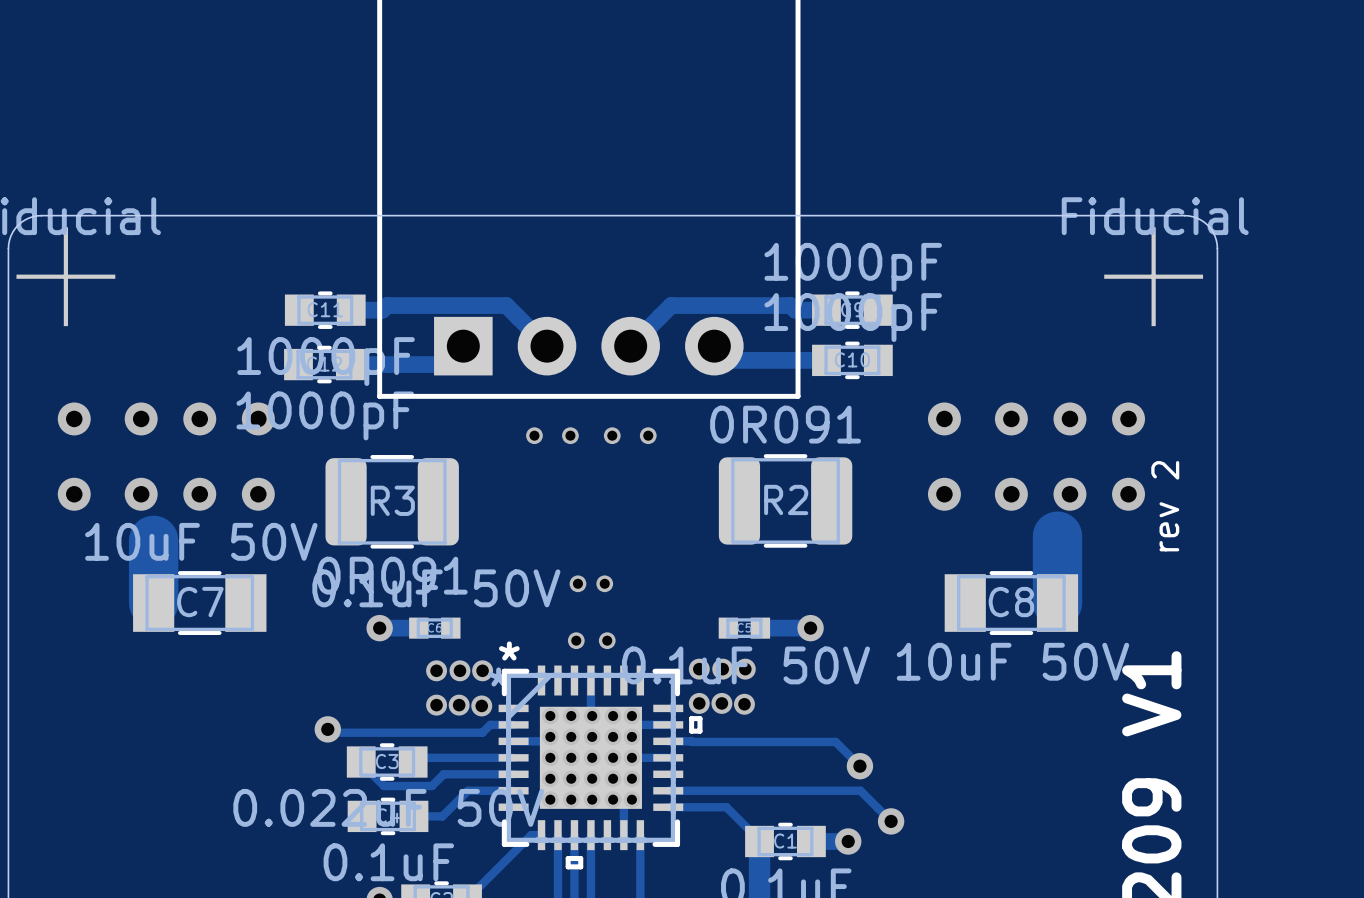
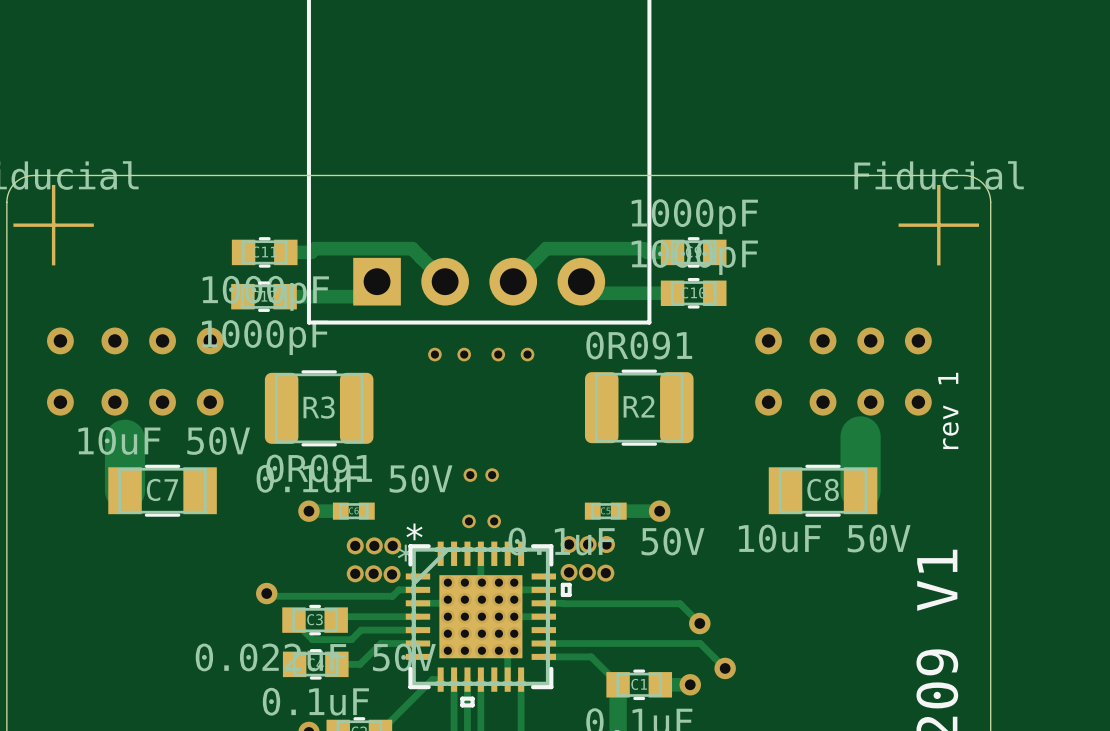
text: rev 2 (1165, 506) -> rev 1 (948, 410)

